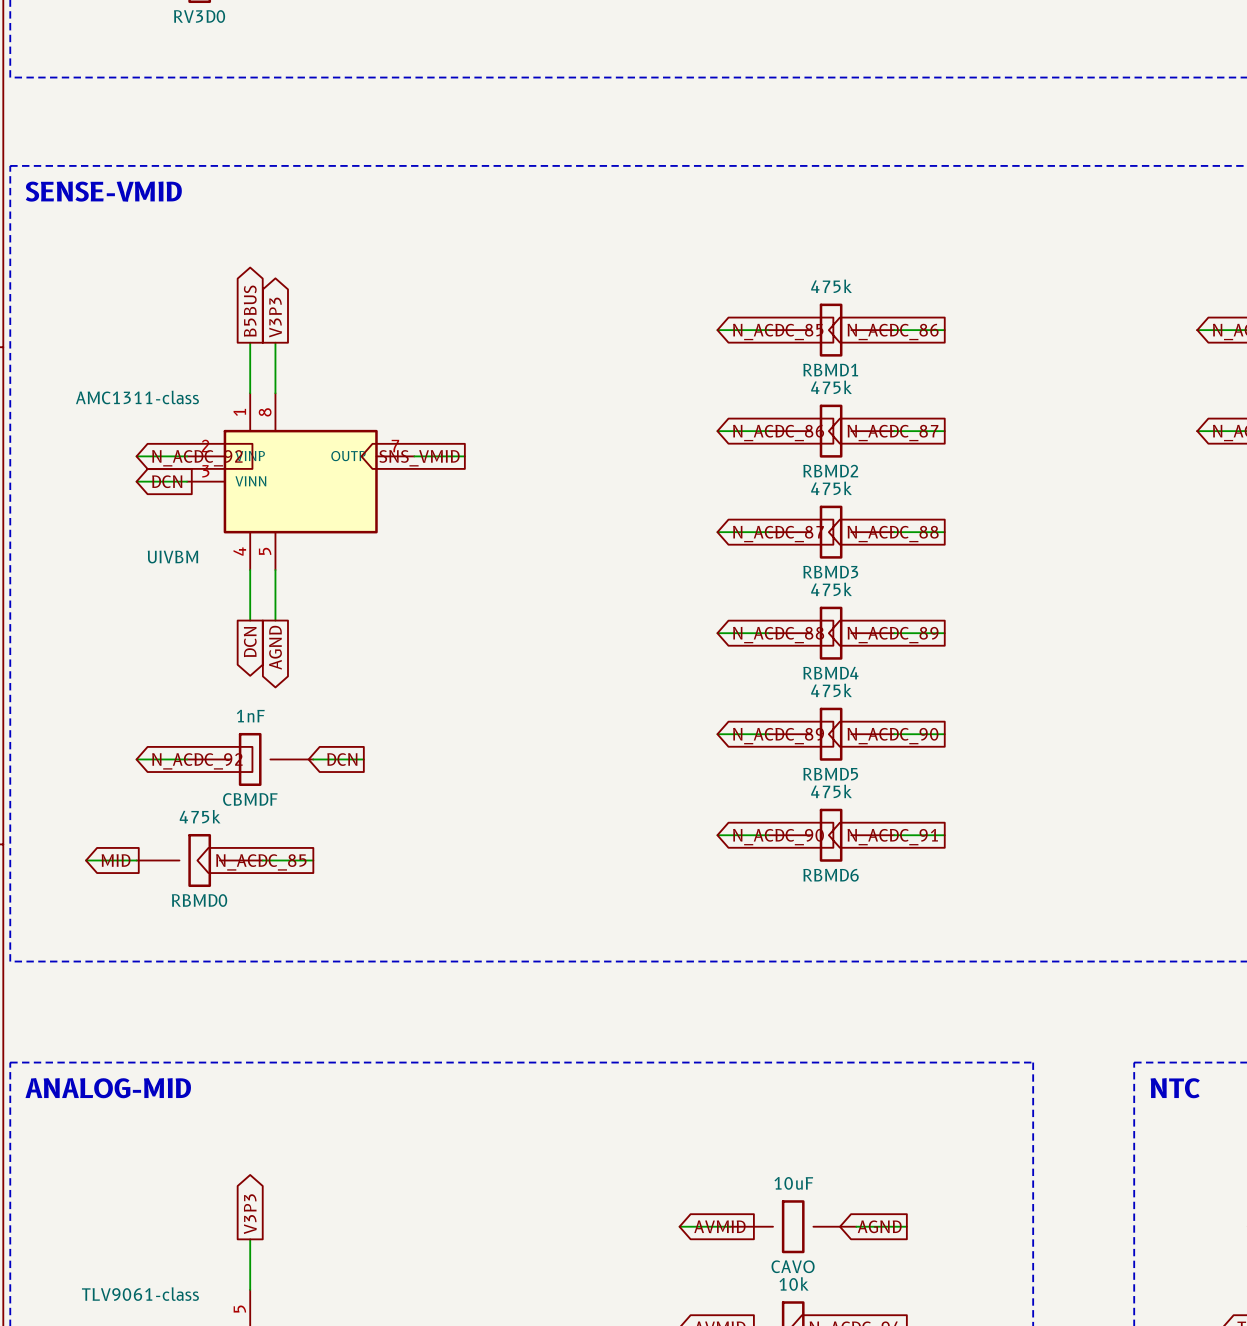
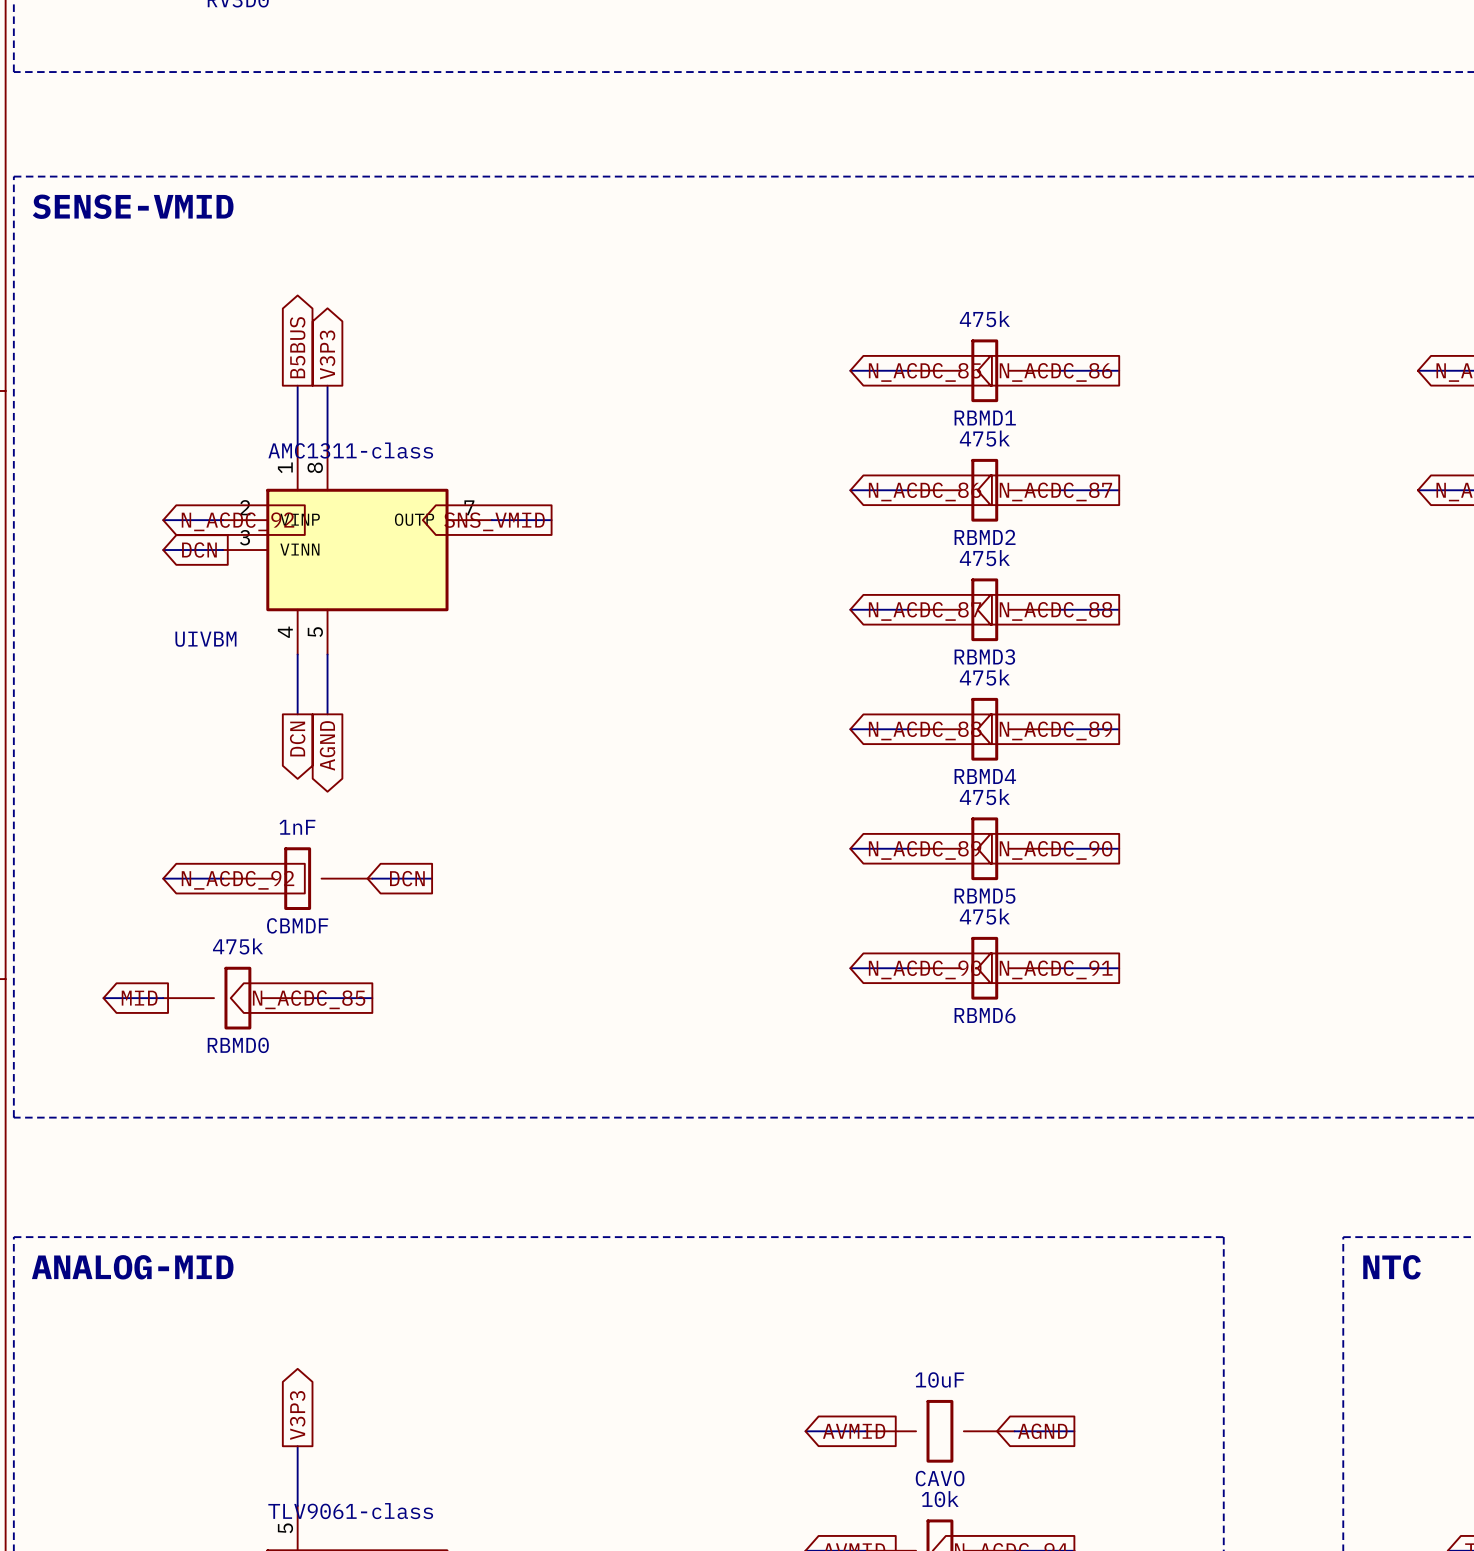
UIVBM value position: AMC1311-class (137, 397) -> AMC1311-class (350, 450)
part value position: TLV9061-class (140, 1294) -> TLV9061-class (350, 1511)

